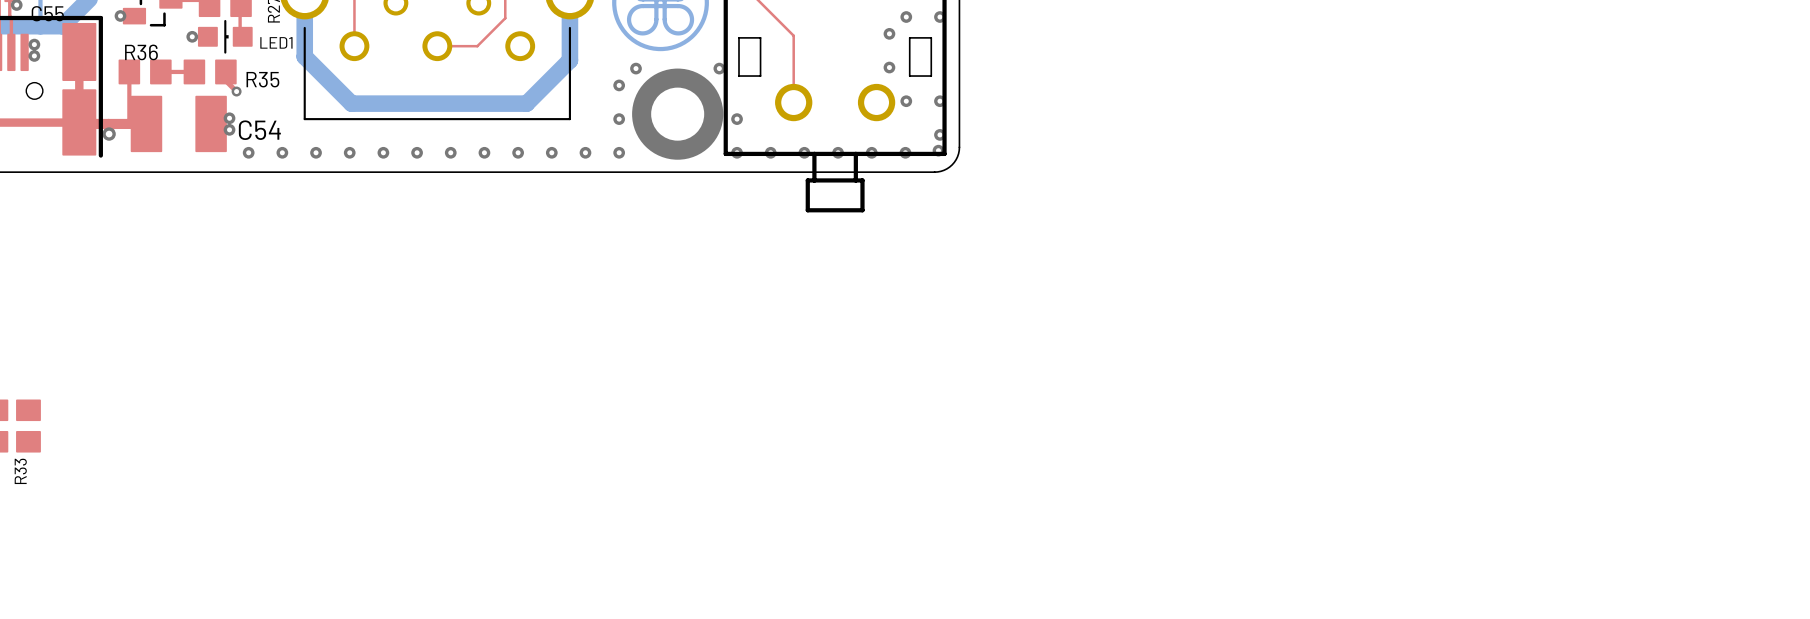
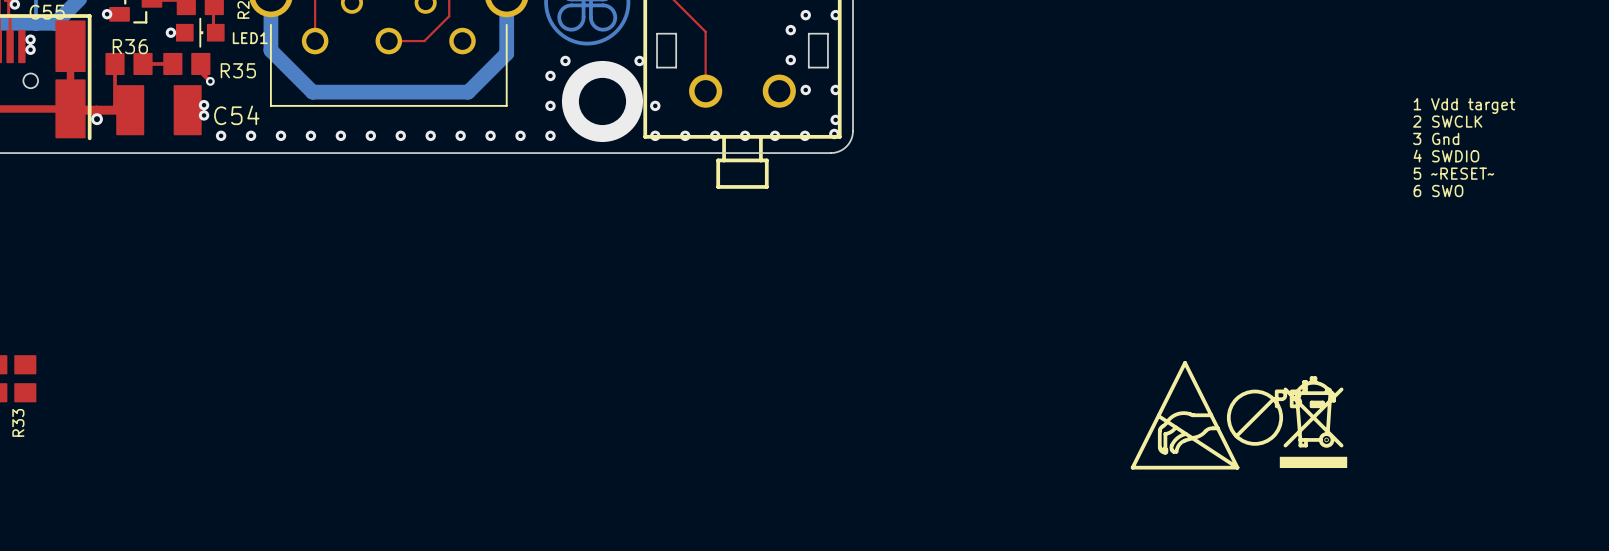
text: none -> 1 Vdd target (1464, 106)
text: none -> 2 SWCLK (1447, 121)
text: none -> 3 Gnd (1436, 138)
text: none -> 4 SWDIO (1446, 156)
text: none -> 5 ~RESET~ (1453, 173)
text: none -> 6 SWO (1438, 190)
drawing: none -> [1130, 360, 1348, 470]

